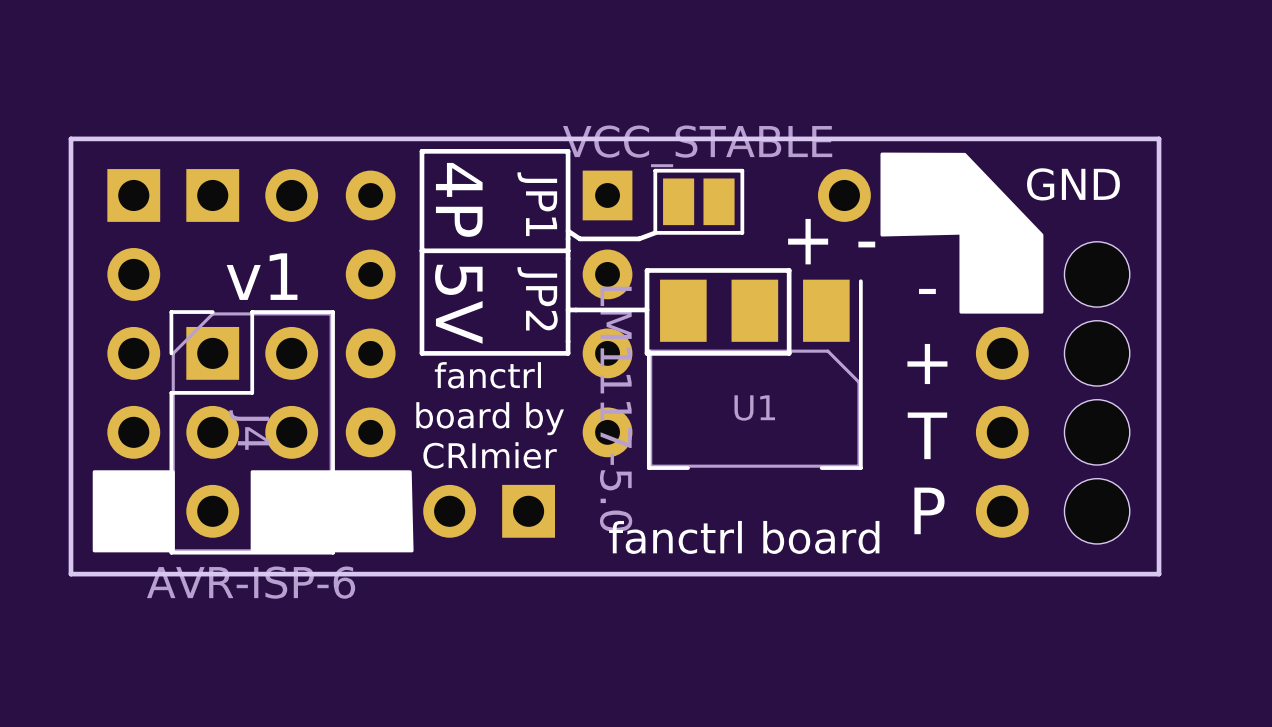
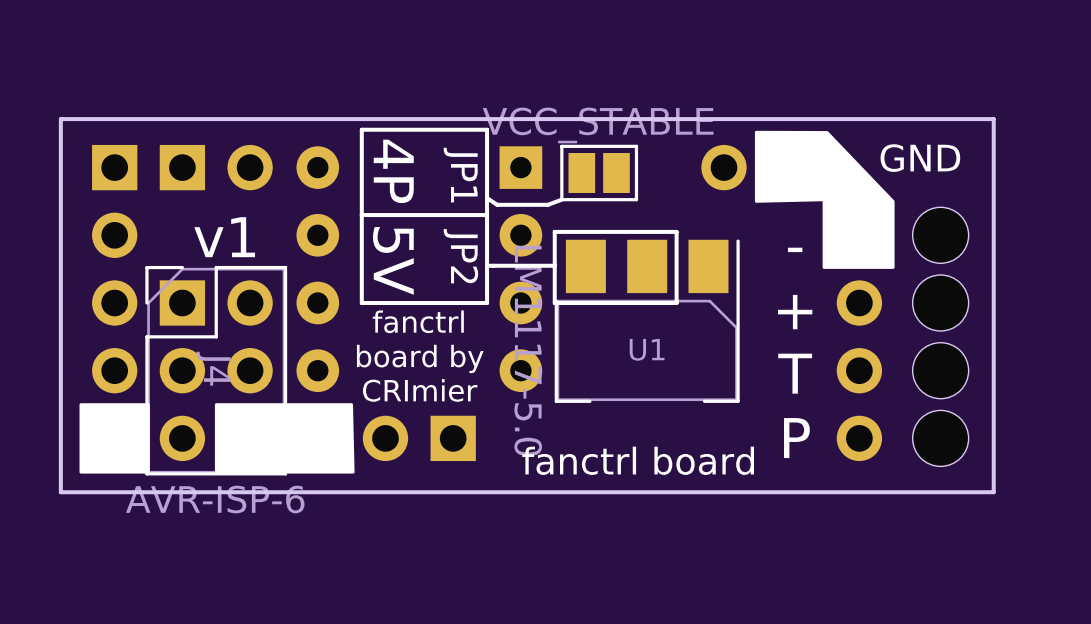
text: + - (831, 241) -> none

